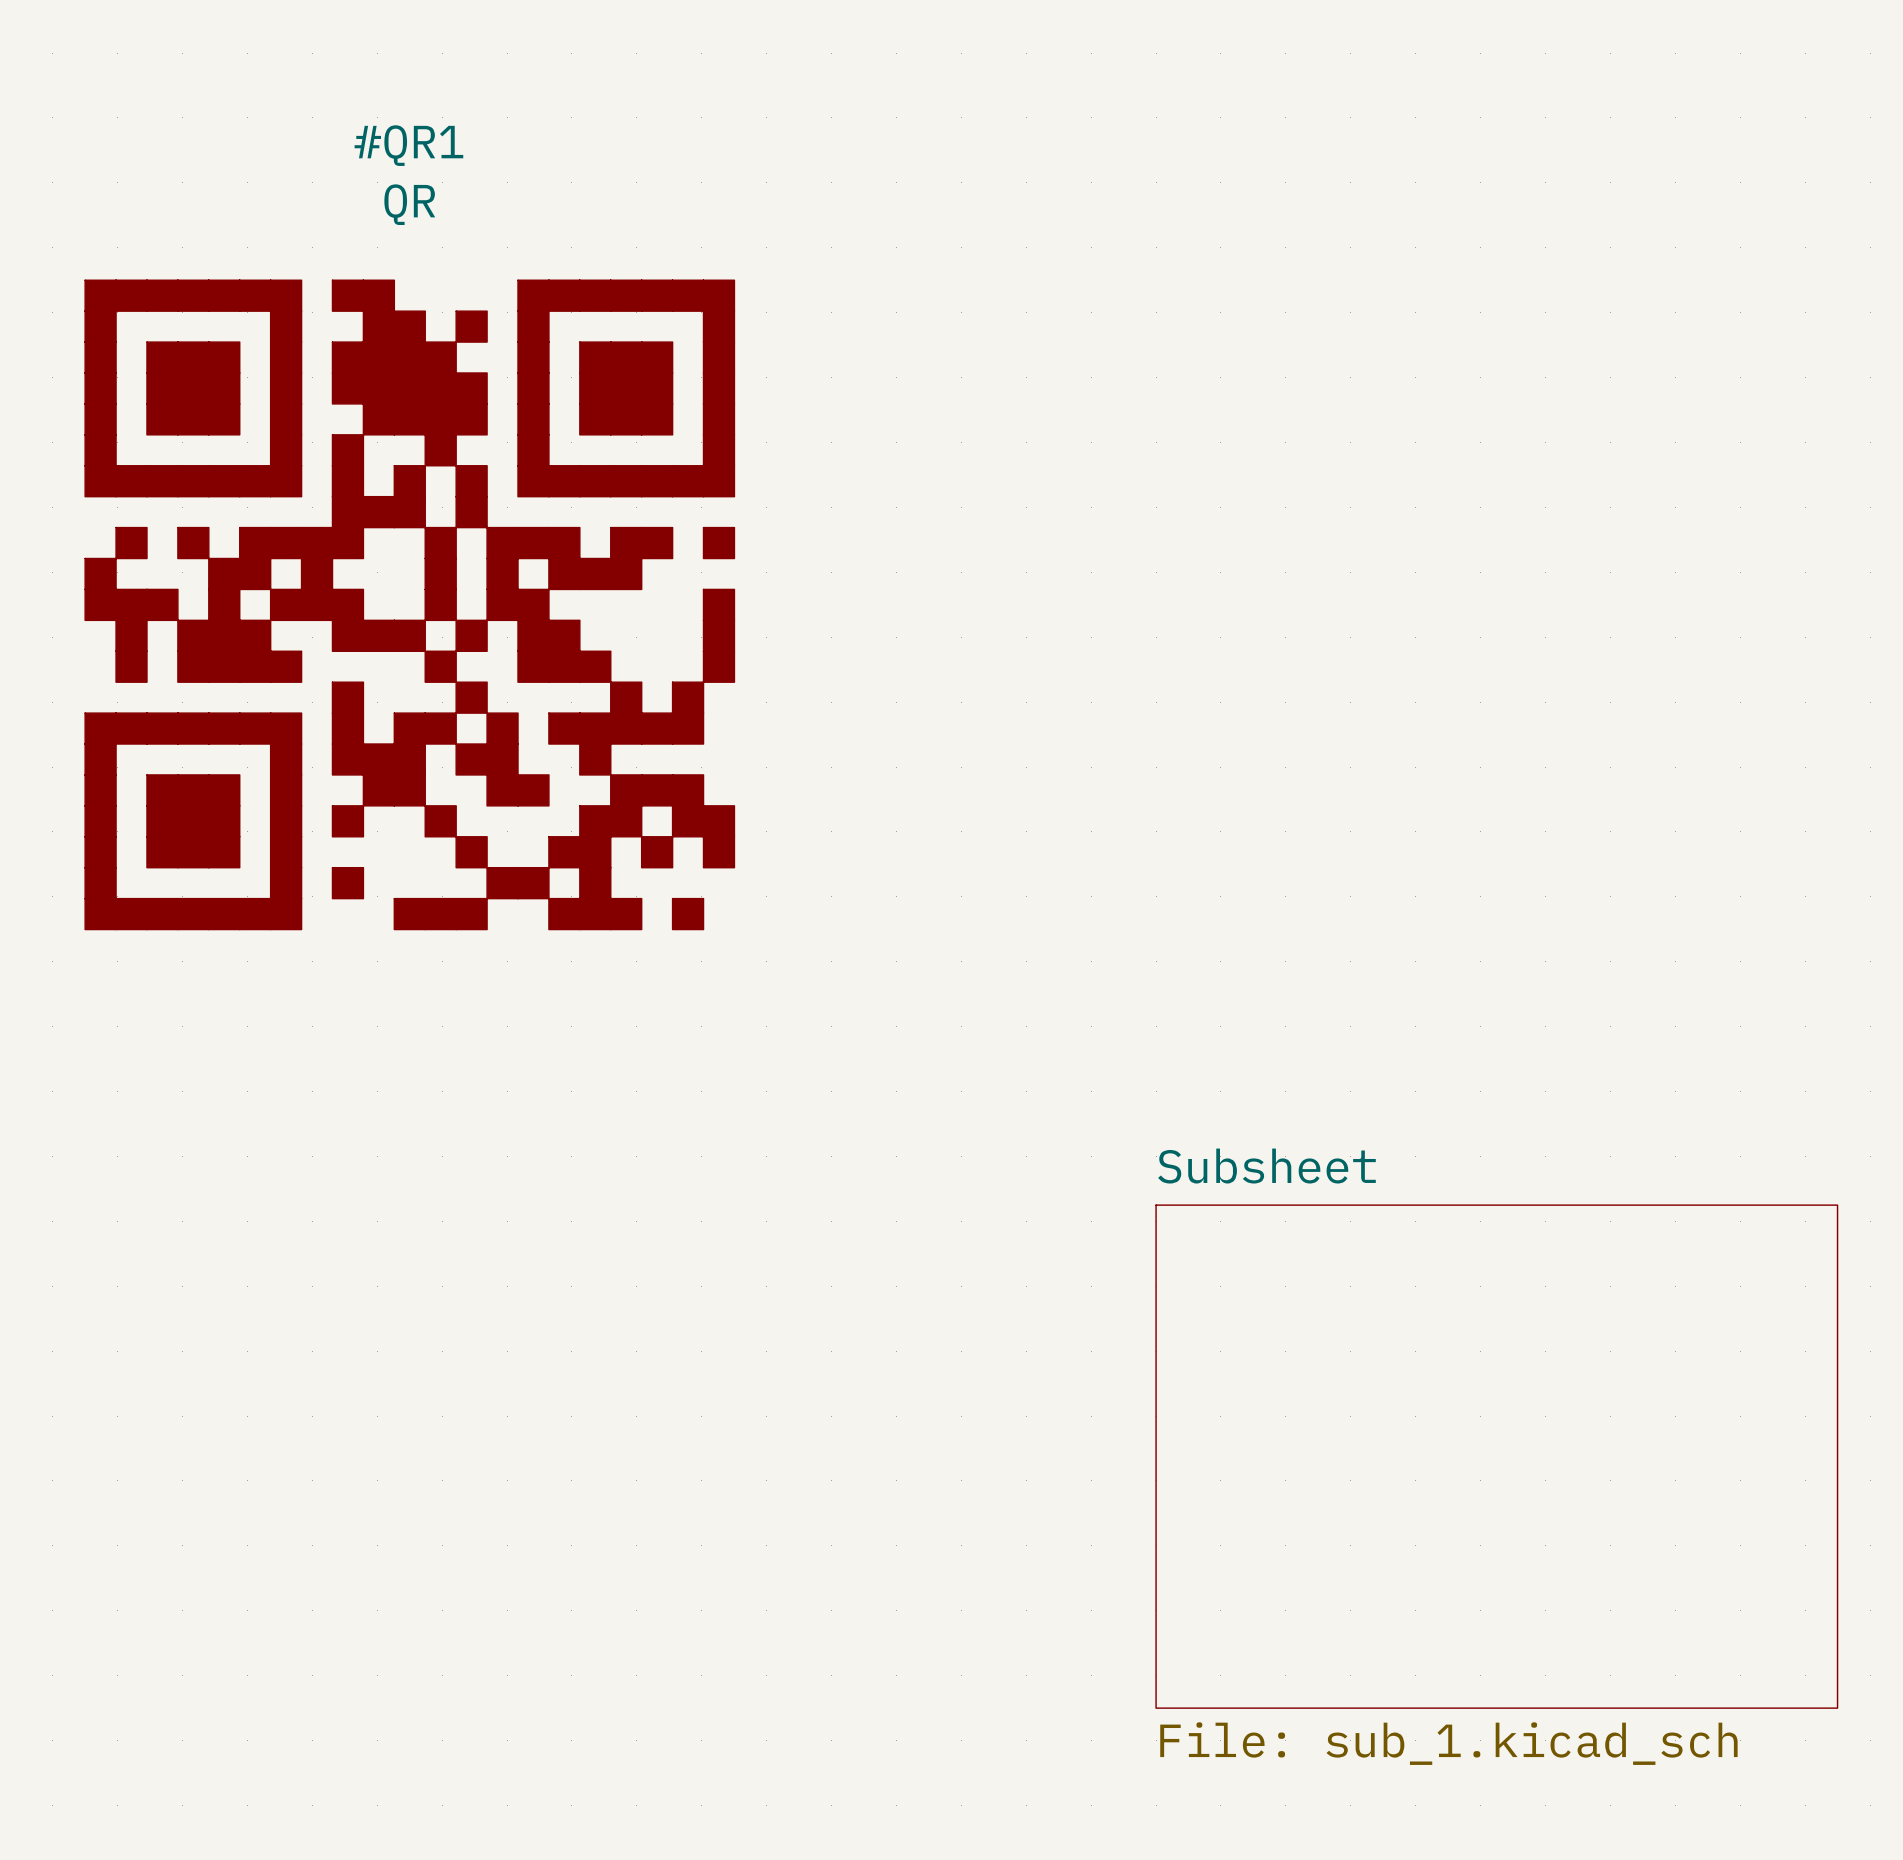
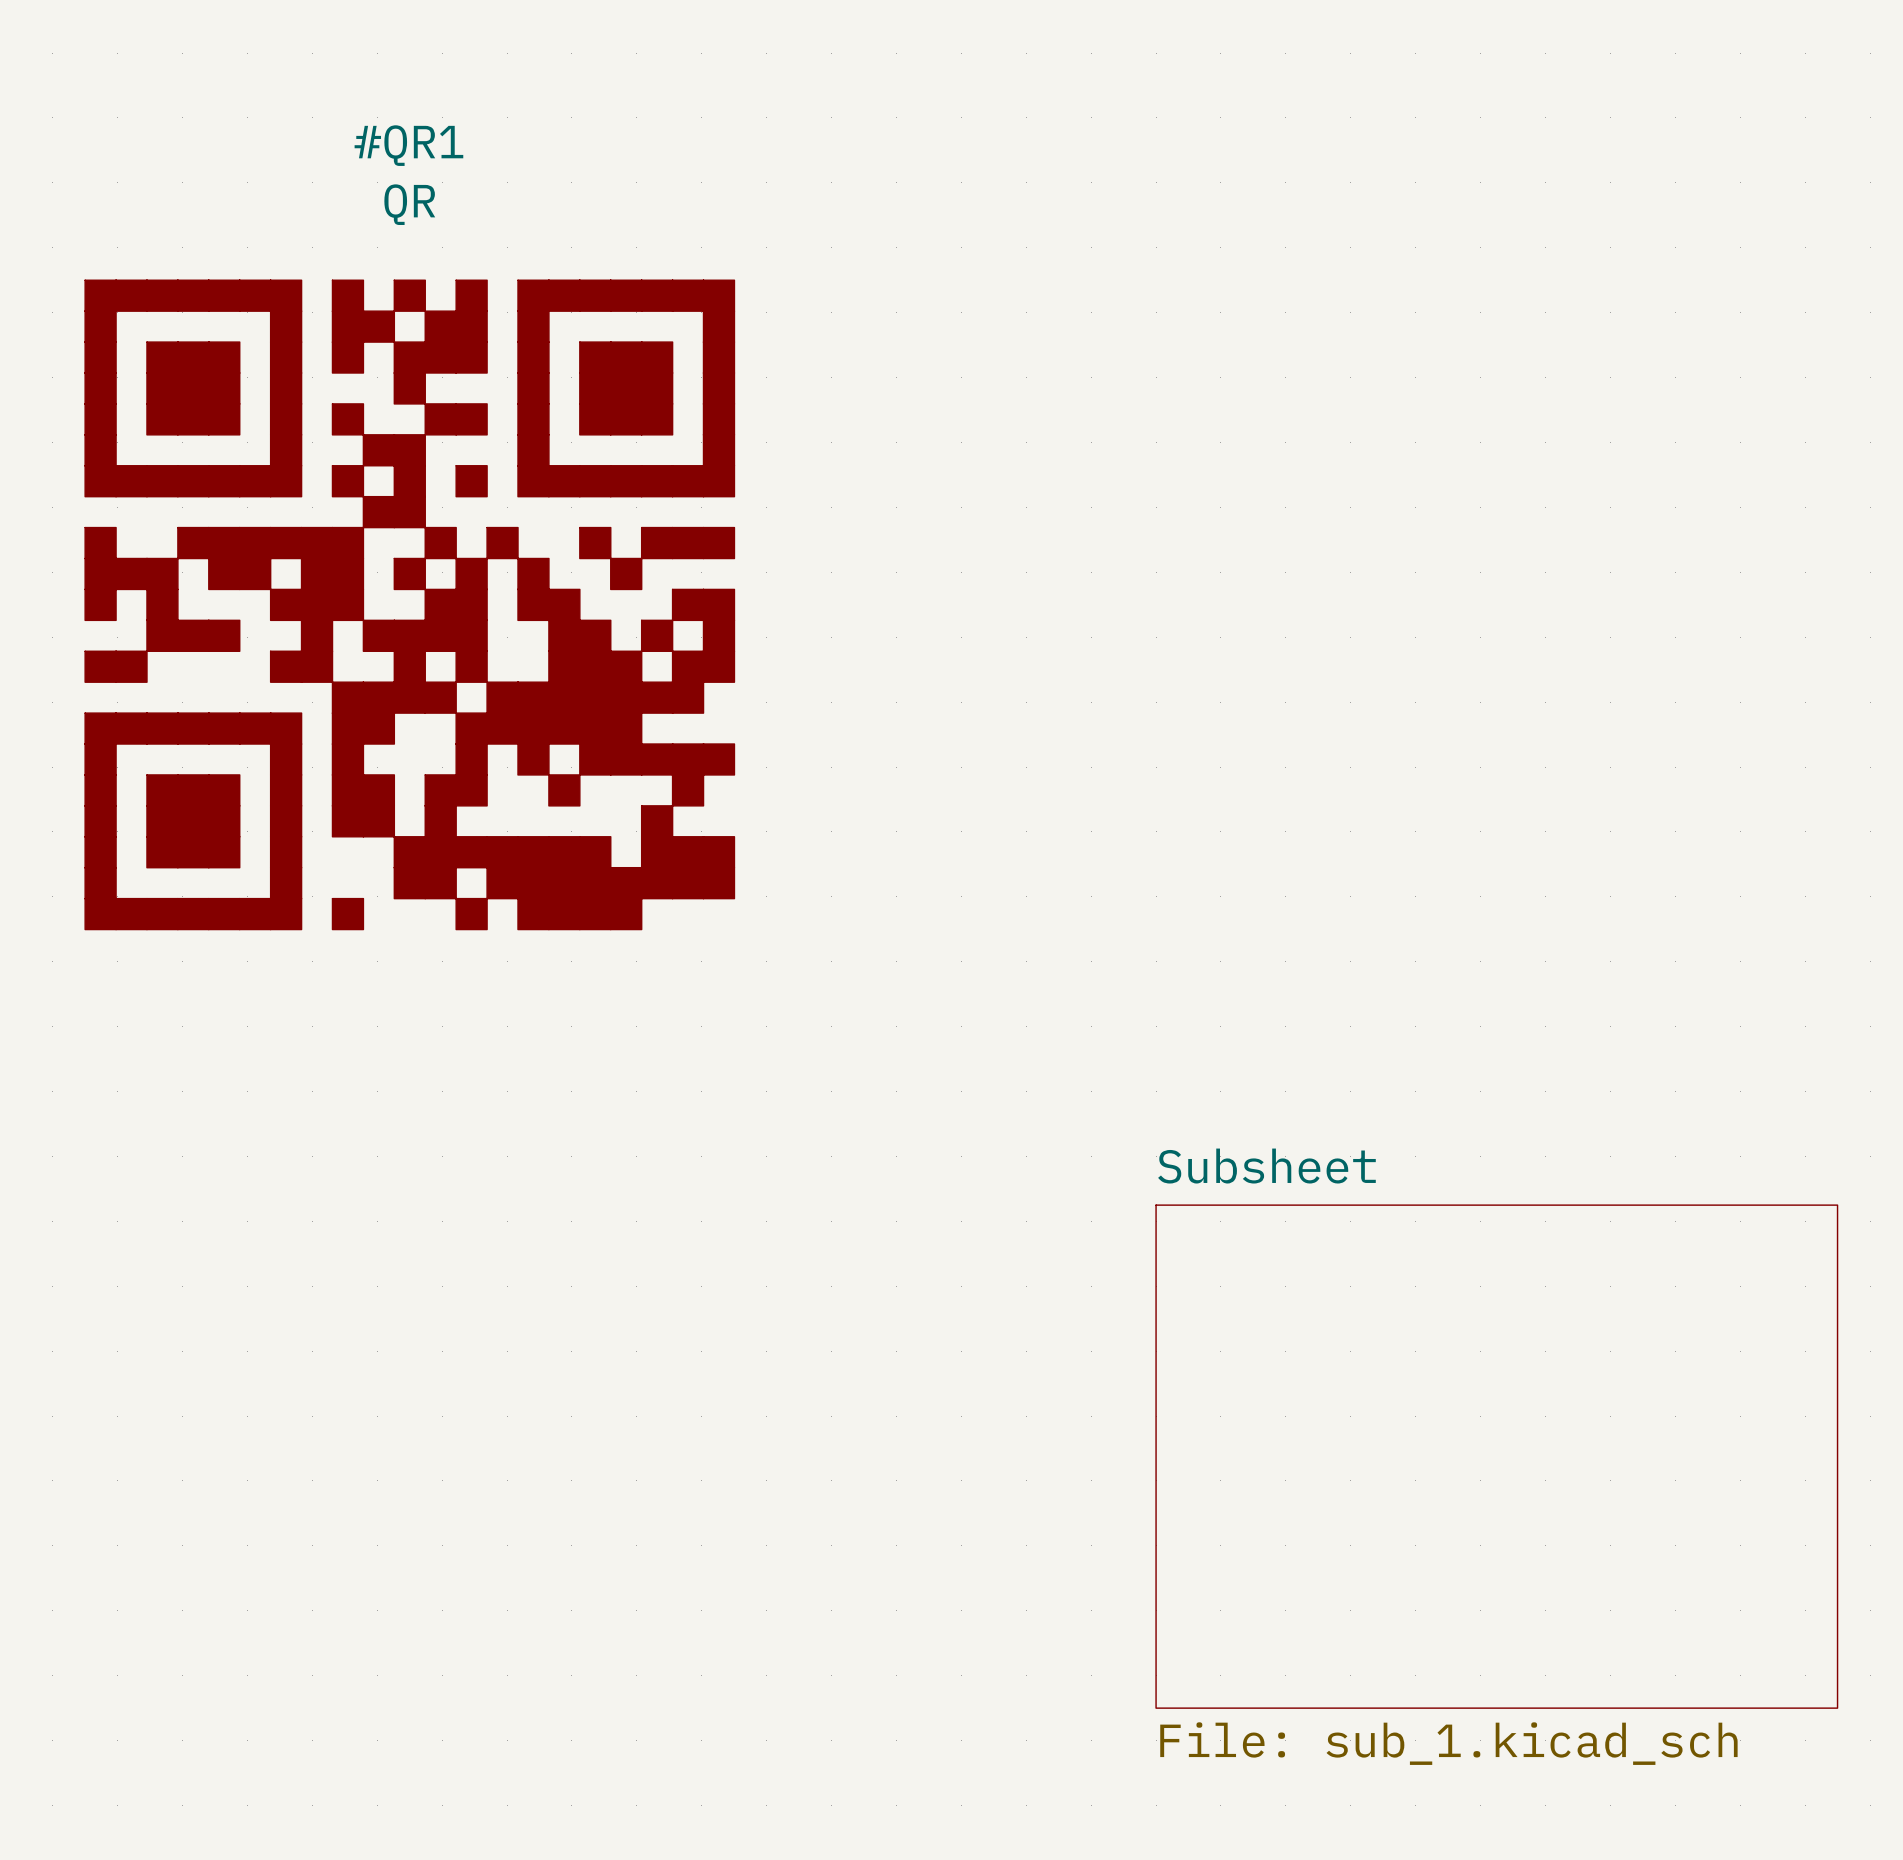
#QR1 shape: [85, 280, 735, 930] -> [85, 280, 735, 930]

